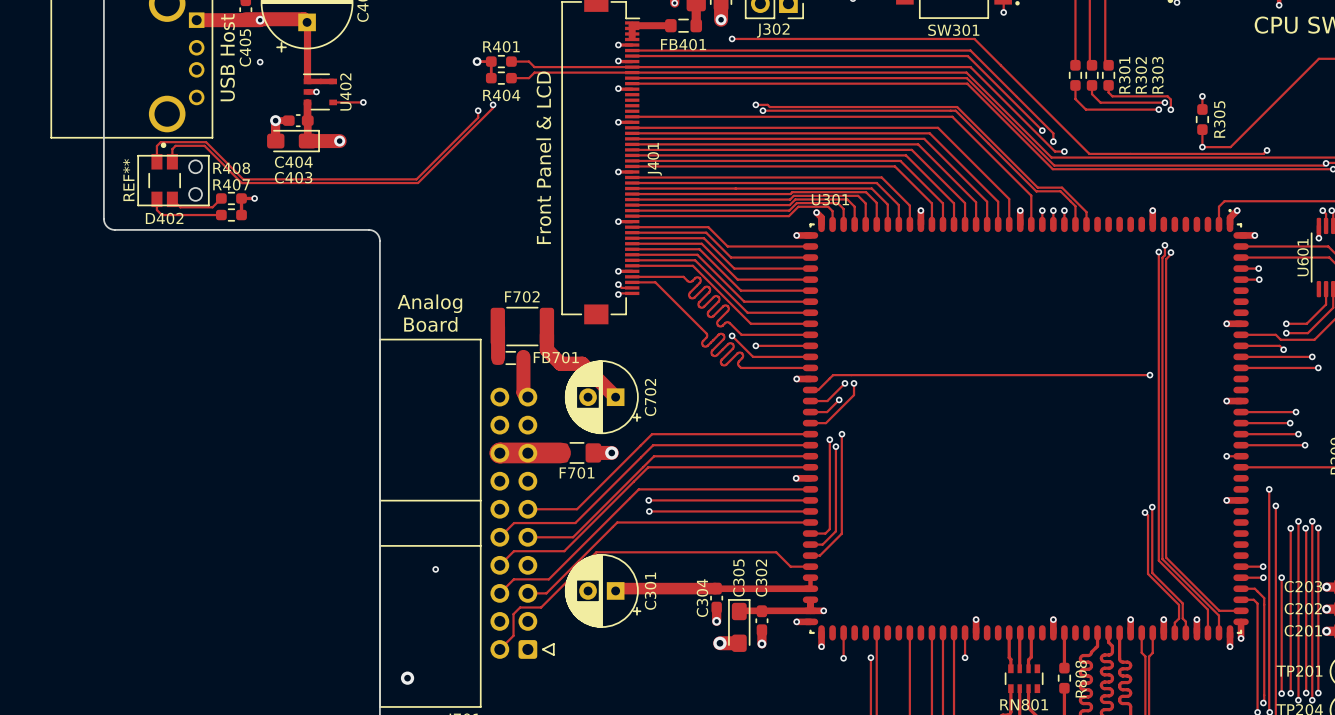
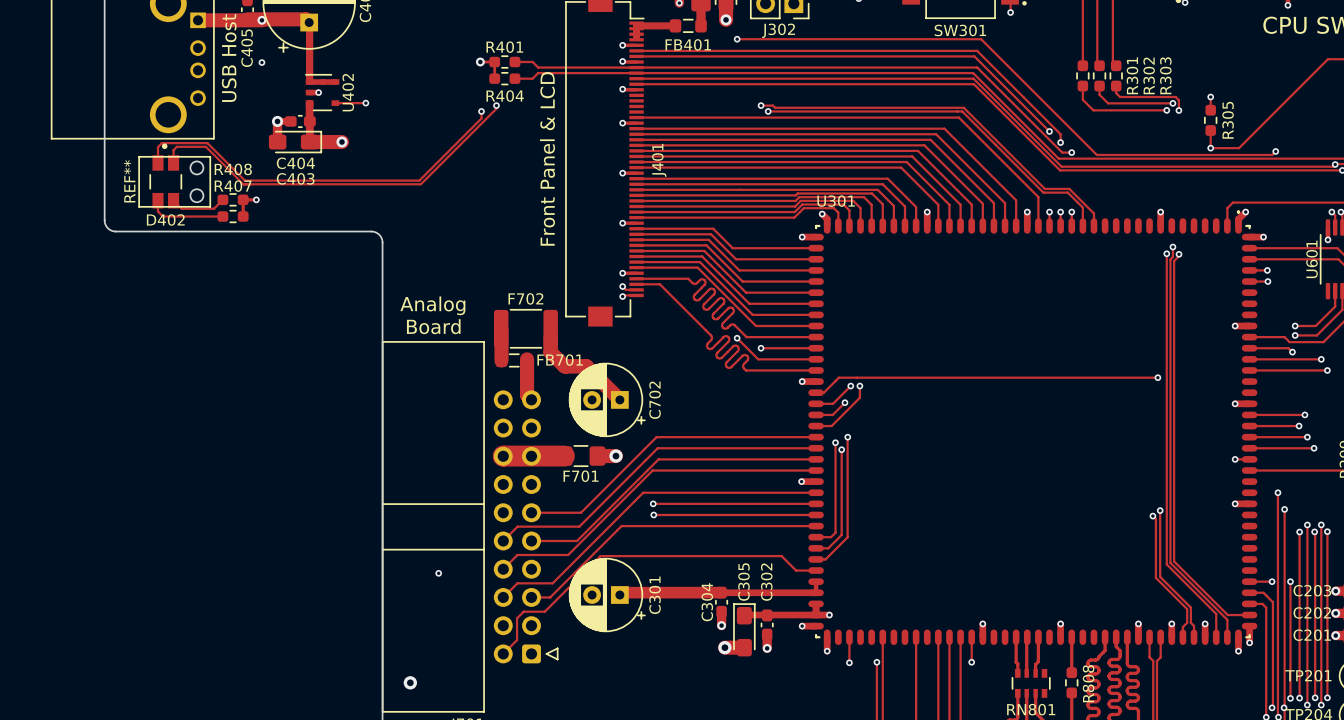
track: (1241, 566) (1263, 566) -> none
via: (1263, 566) -> none
via: none -> (1284, 707)

